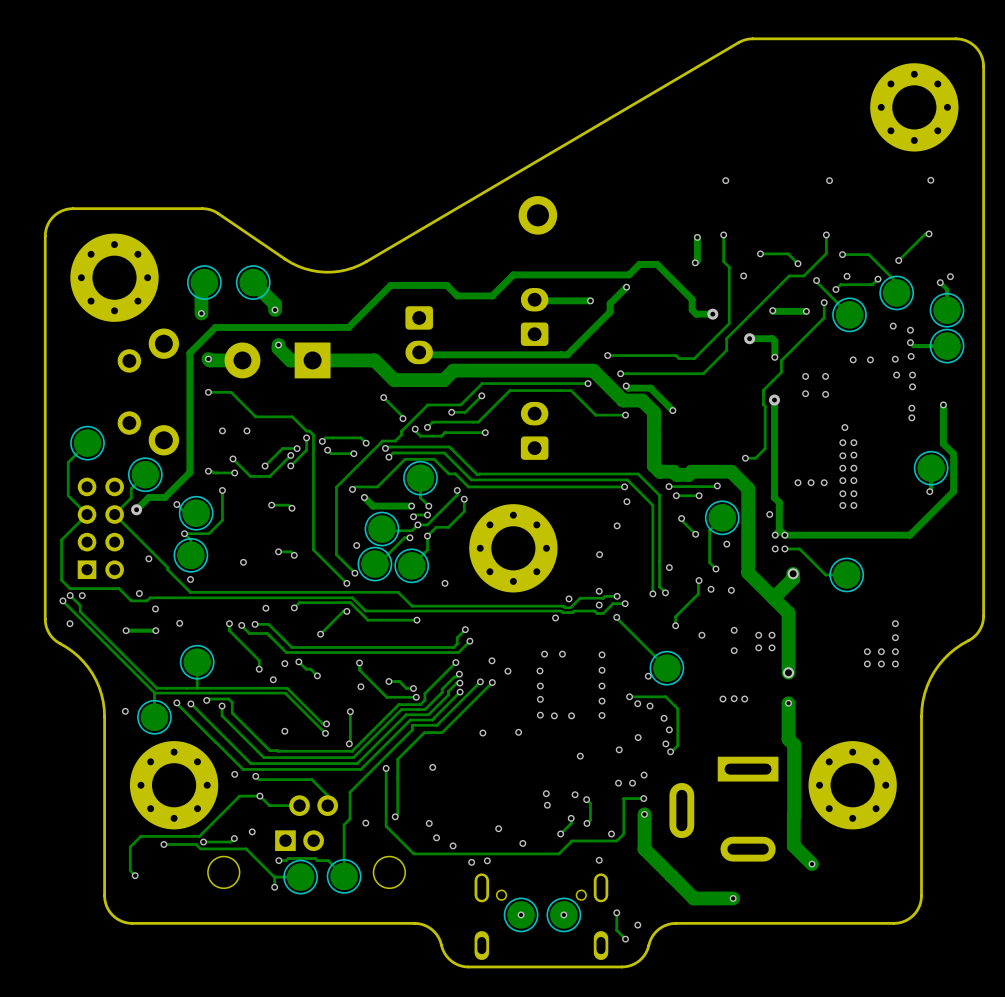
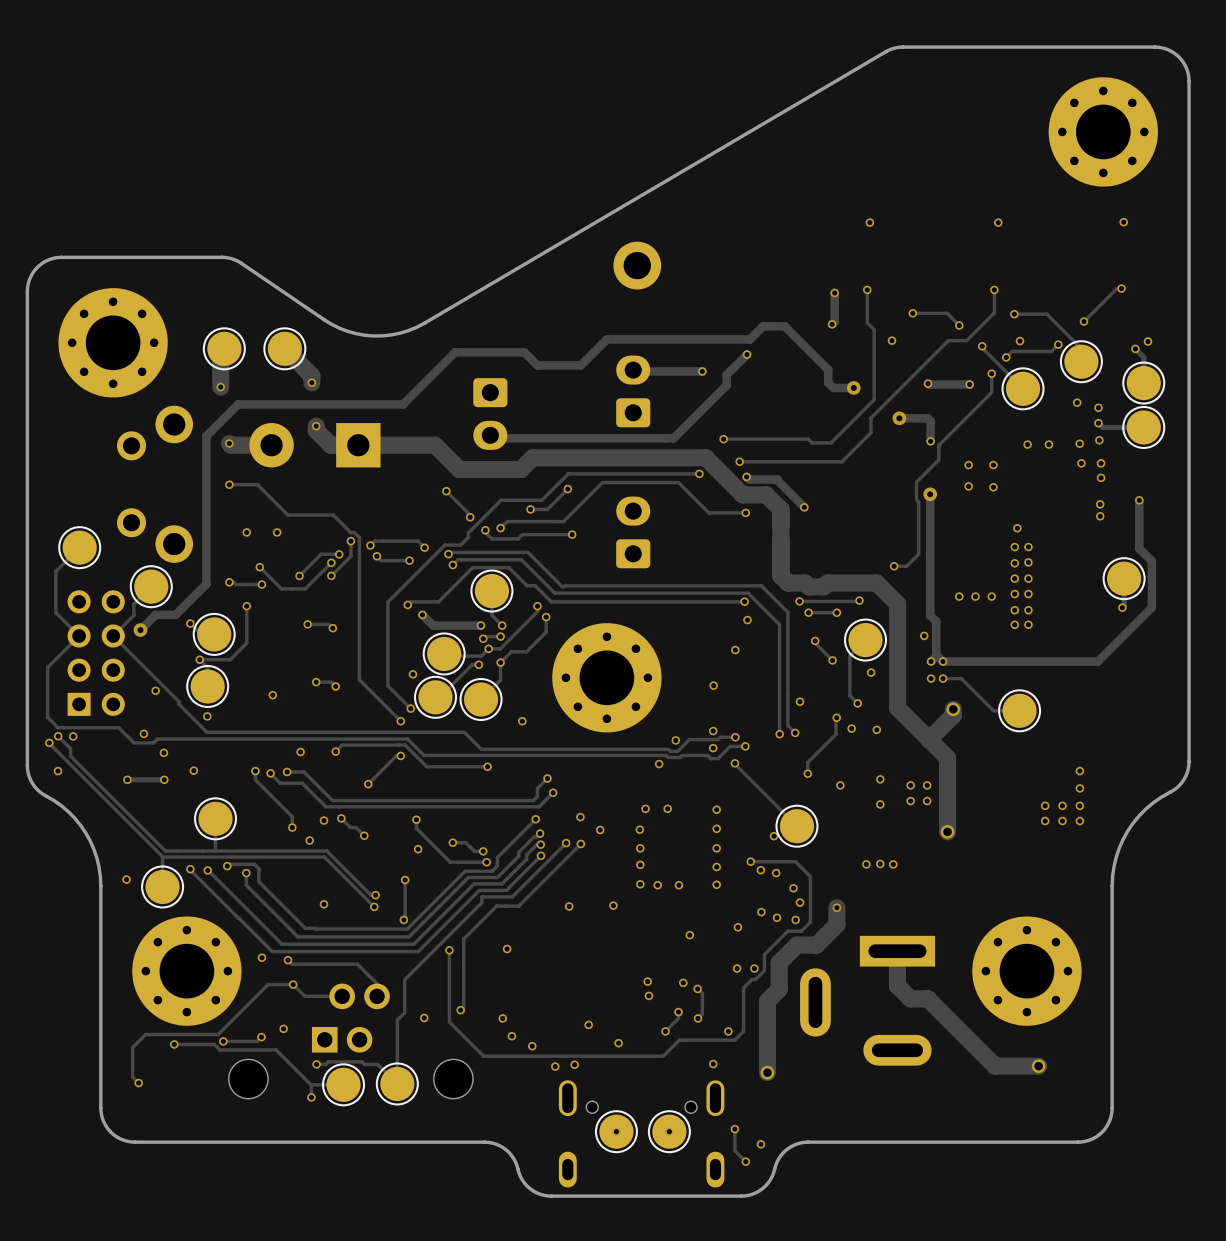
track: (788, 703) (788, 739) (794, 744) (793, 845) (812, 864) -> none
via: (788, 703) -> none
track: none -> (836, 907) (836, 924) (816, 945) (796, 945) (779, 962) (779, 989) (767, 1001) (767, 1072)
via: none -> (836, 907)
via: none -> (777, 917)
via: (670, 751) -> none
track: none -> (897, 951) (897, 985) (910, 998) (928, 998) (995, 1066) (1038, 1066)
via: (644, 775) -> none
track: (643, 798) (624, 798) -> (801, 931) (787, 931) (764, 954) (764, 970) (744, 987)
via: (643, 798) -> none
track: (644, 814) (644, 849) (693, 898) (733, 898) -> none
via: (644, 814) -> none
via: none -> (1038, 1066)
via: (812, 864) -> none
via: none -> (767, 1072)
via: (733, 898) -> none

